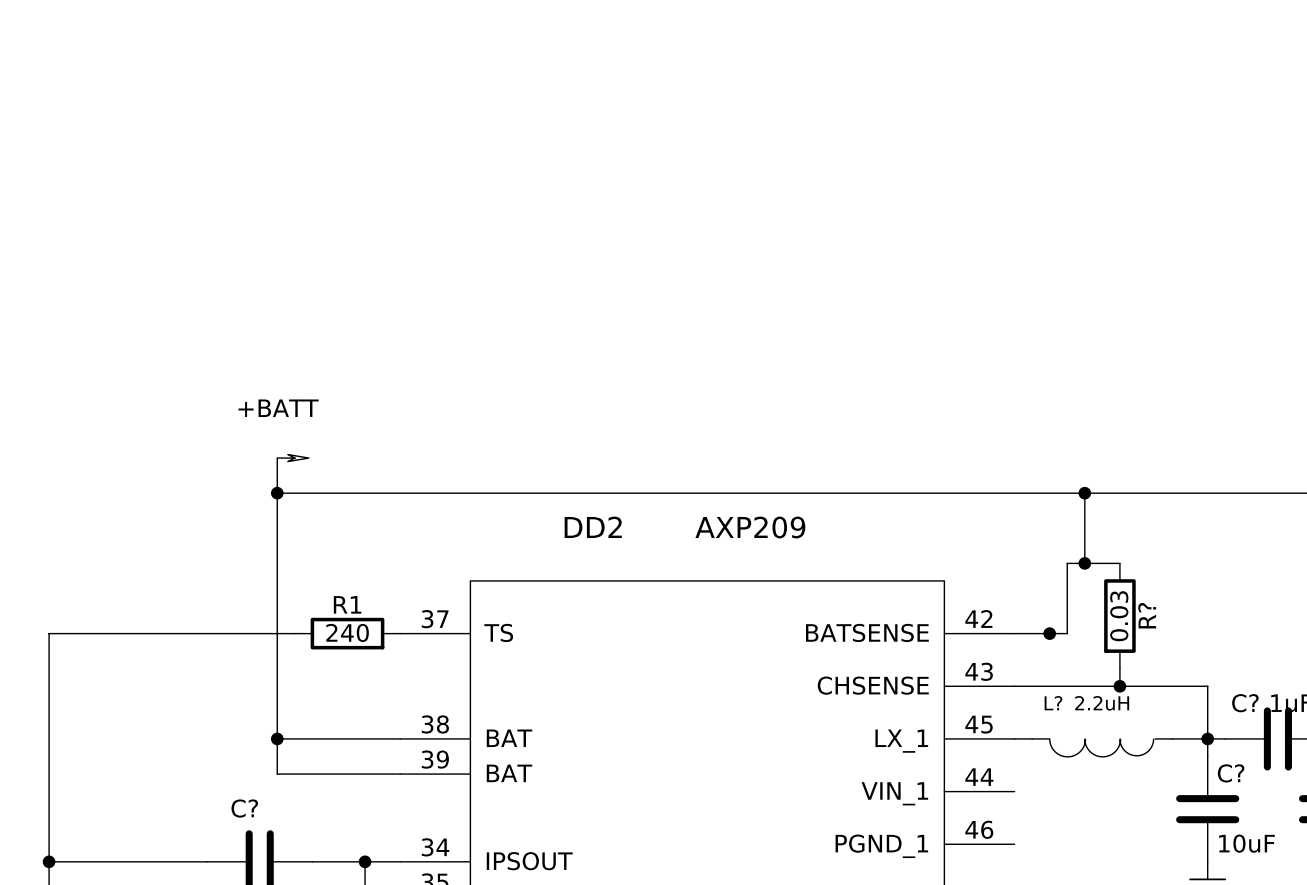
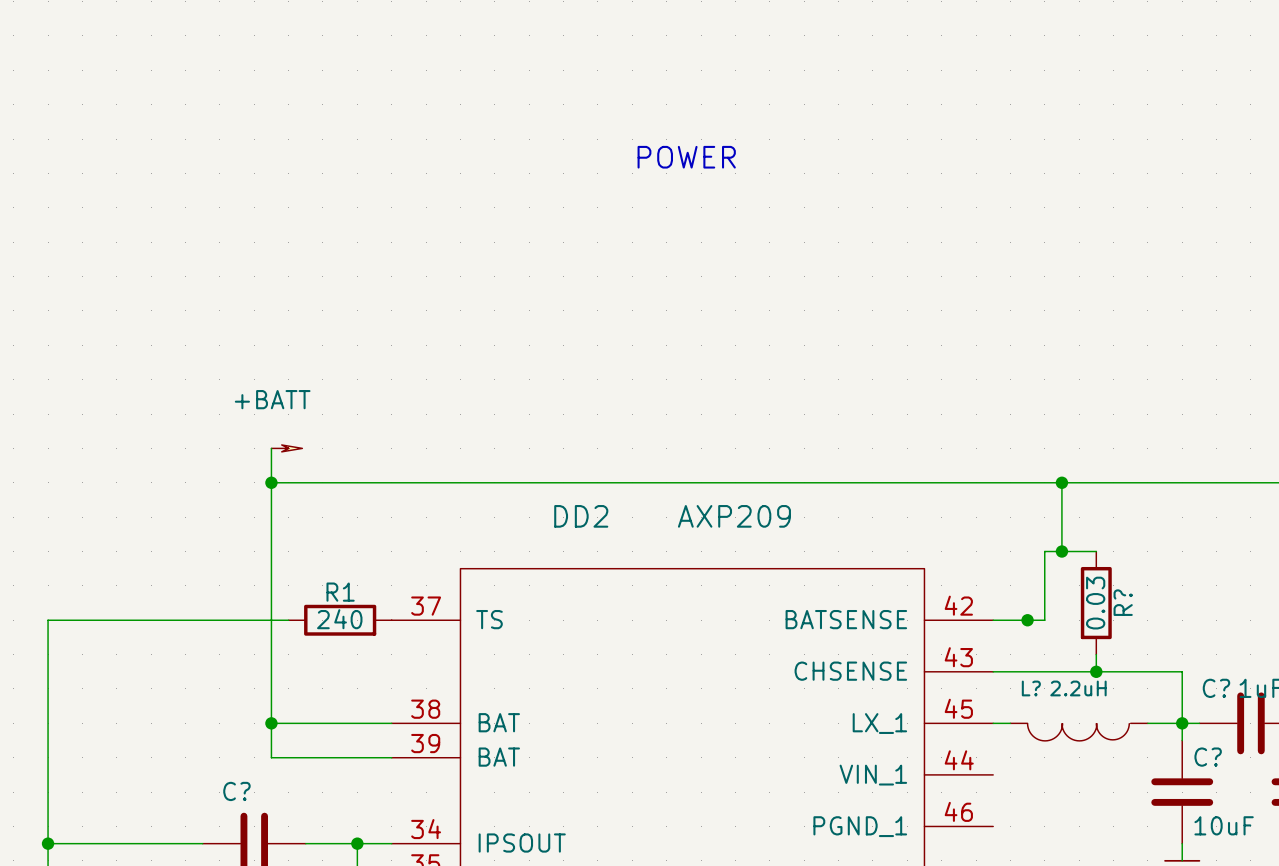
text: none -> POWER (686, 157)

